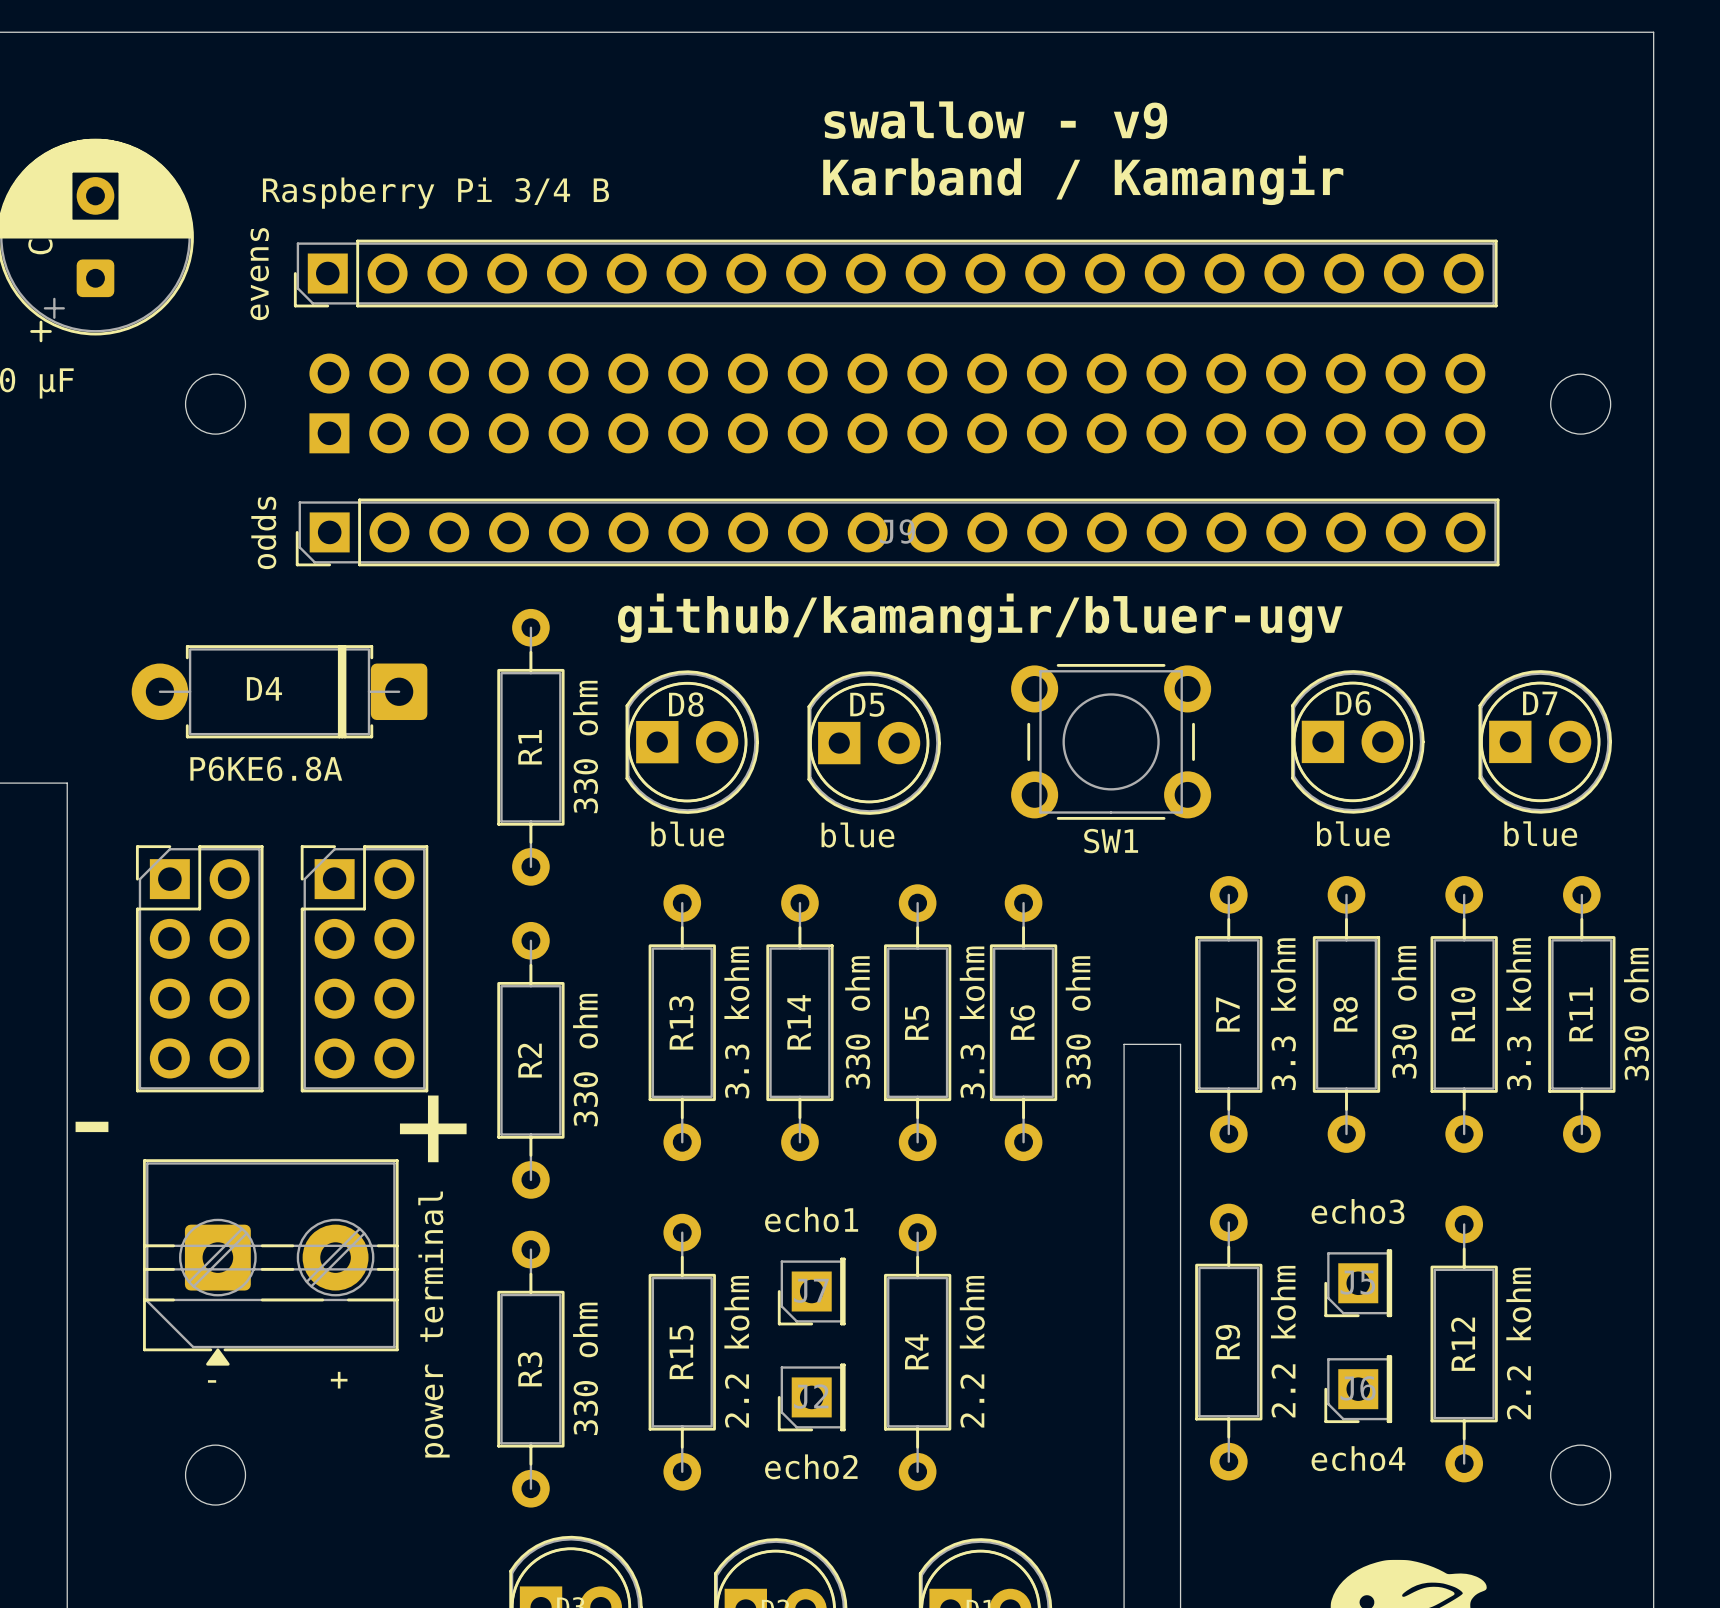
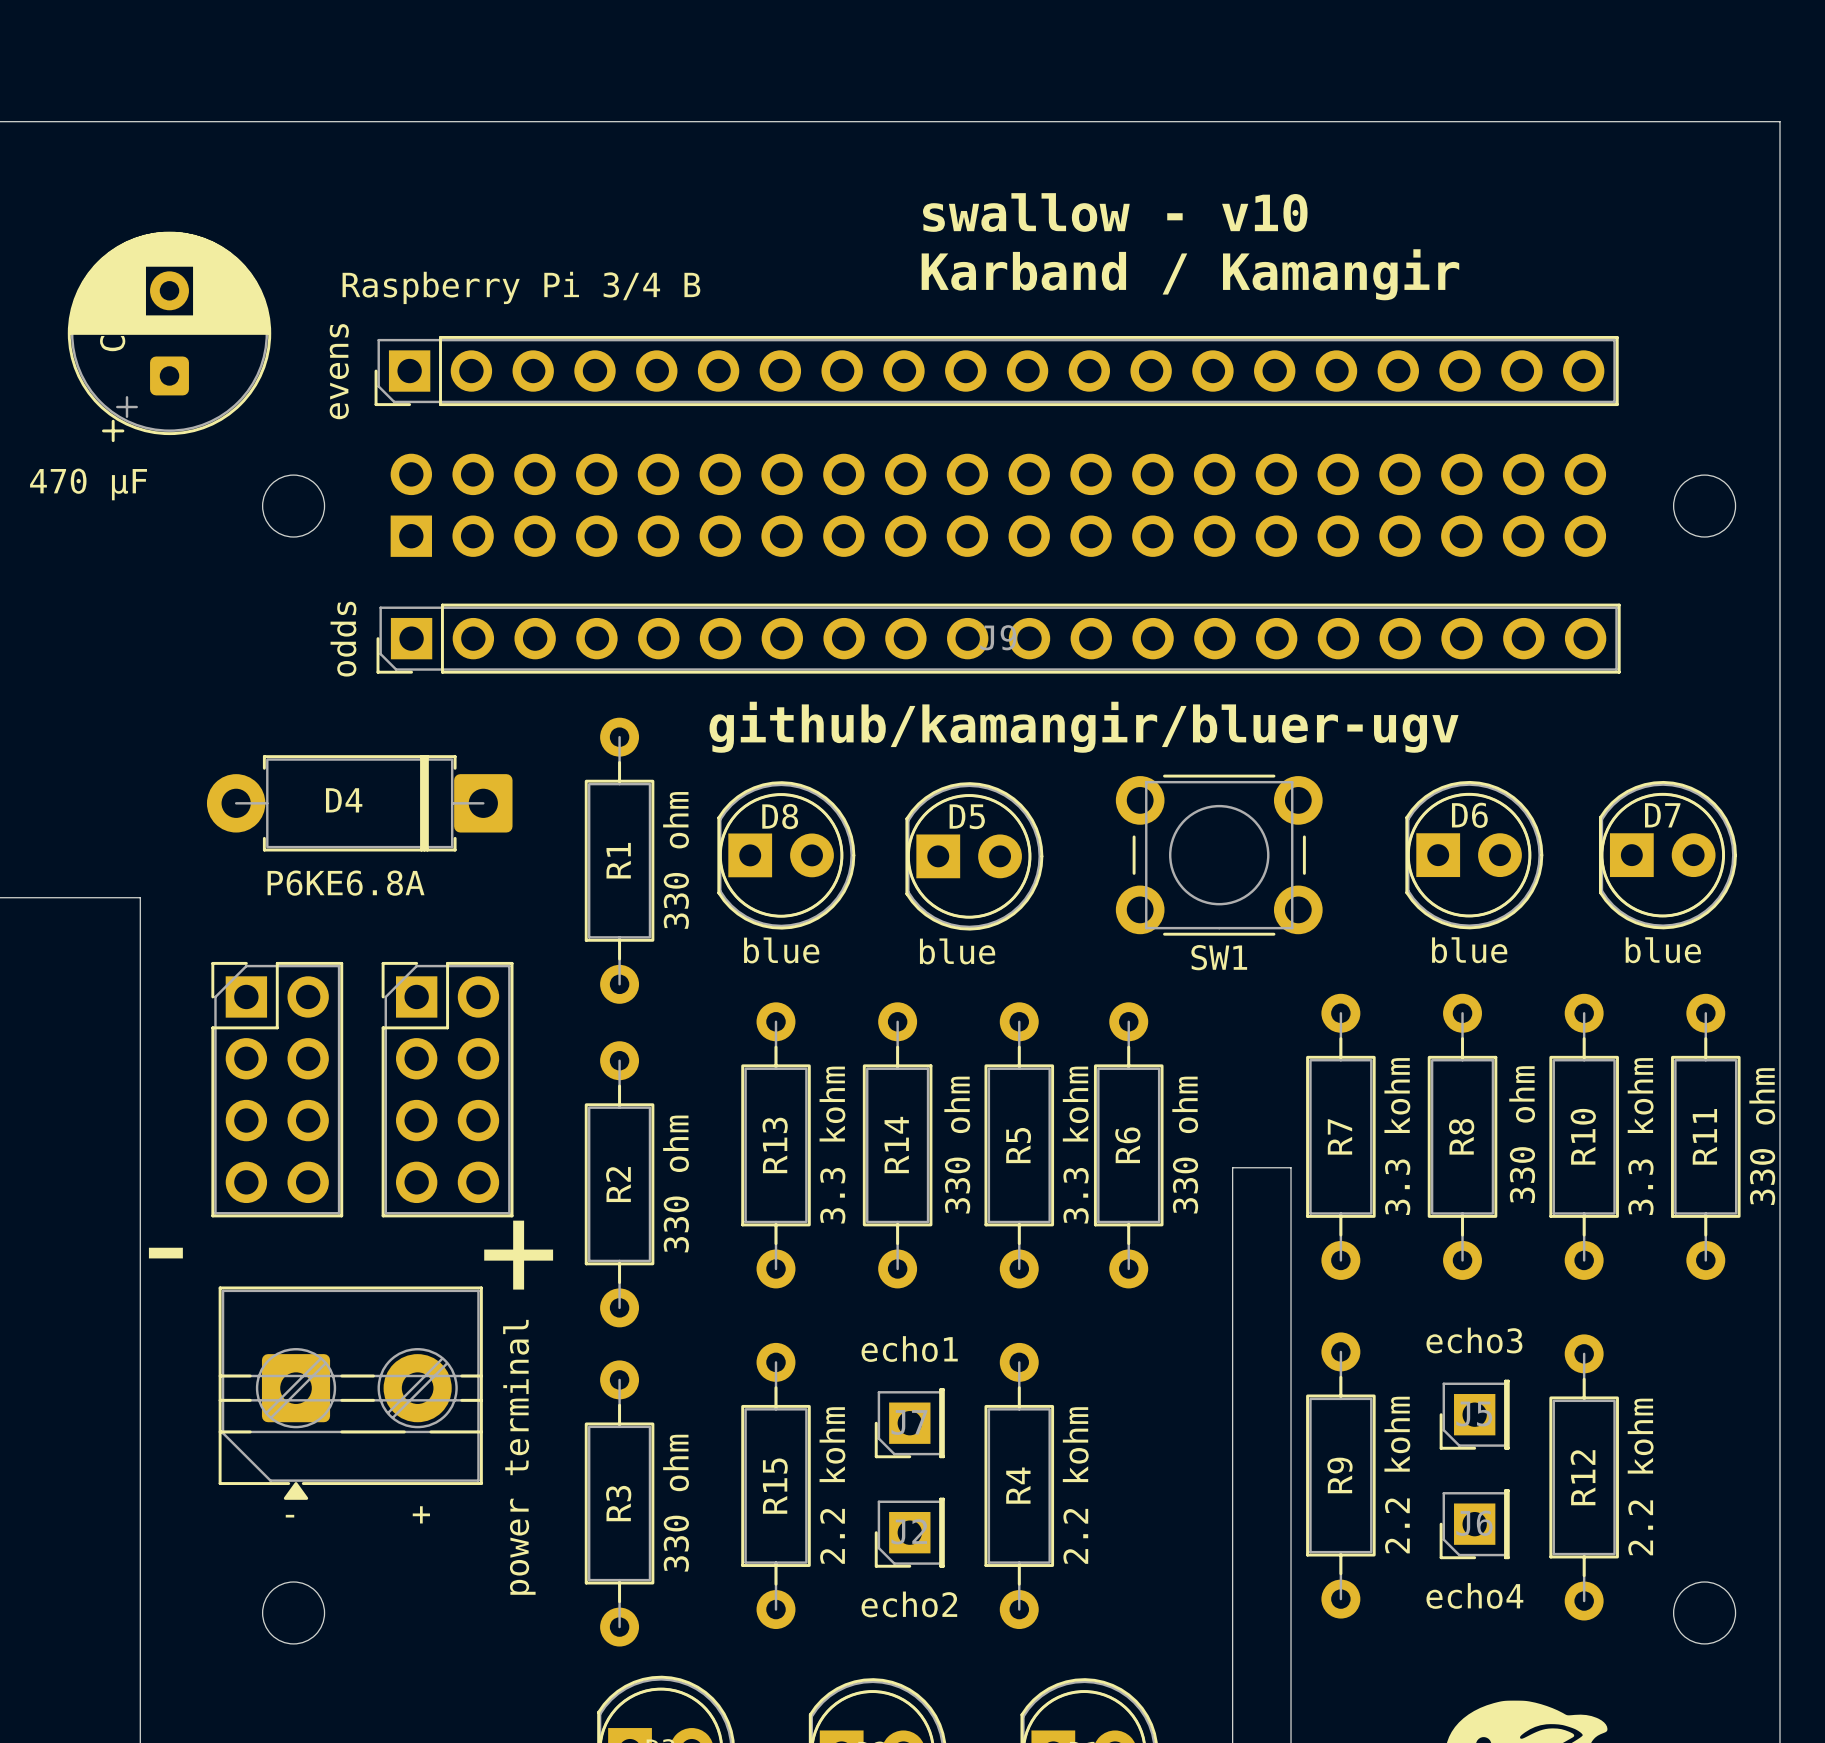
text: swallow - v9 (995, 120) -> swallow - v10 (1115, 212)

